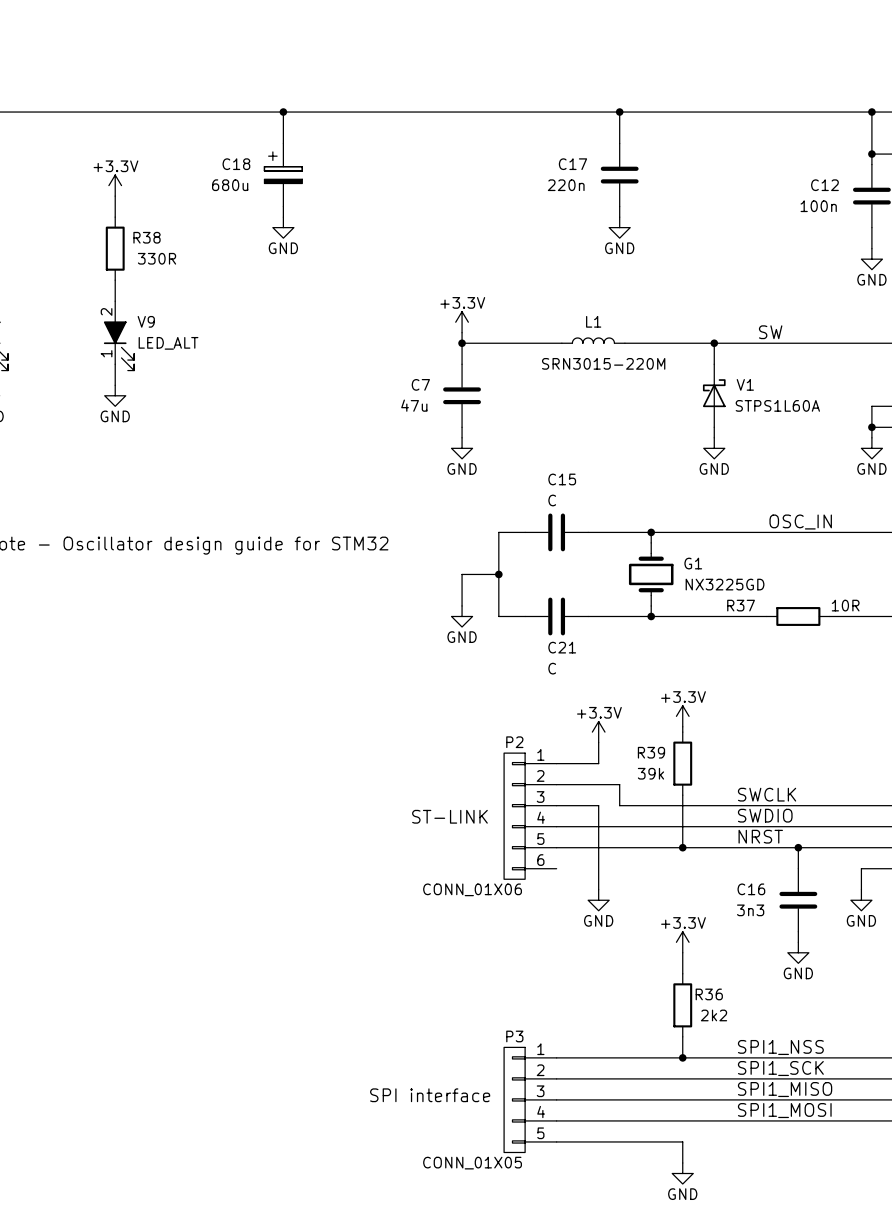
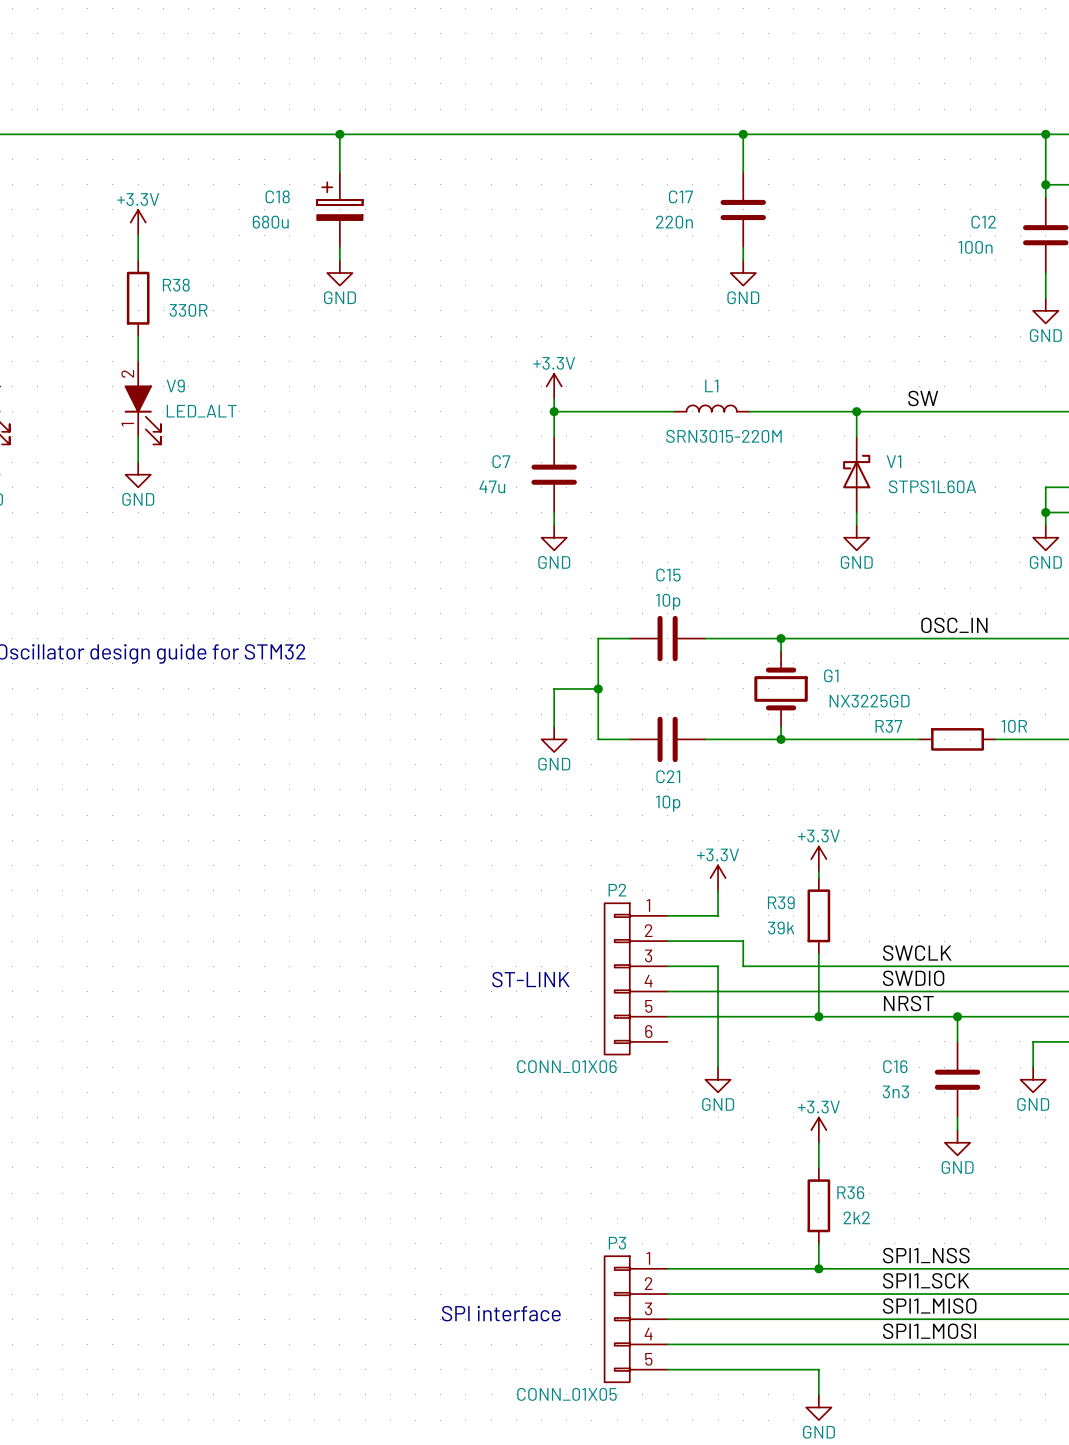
C15 value: C (552, 500) -> 10p (668, 601)
C21 value: C (552, 668) -> 10p (668, 803)

